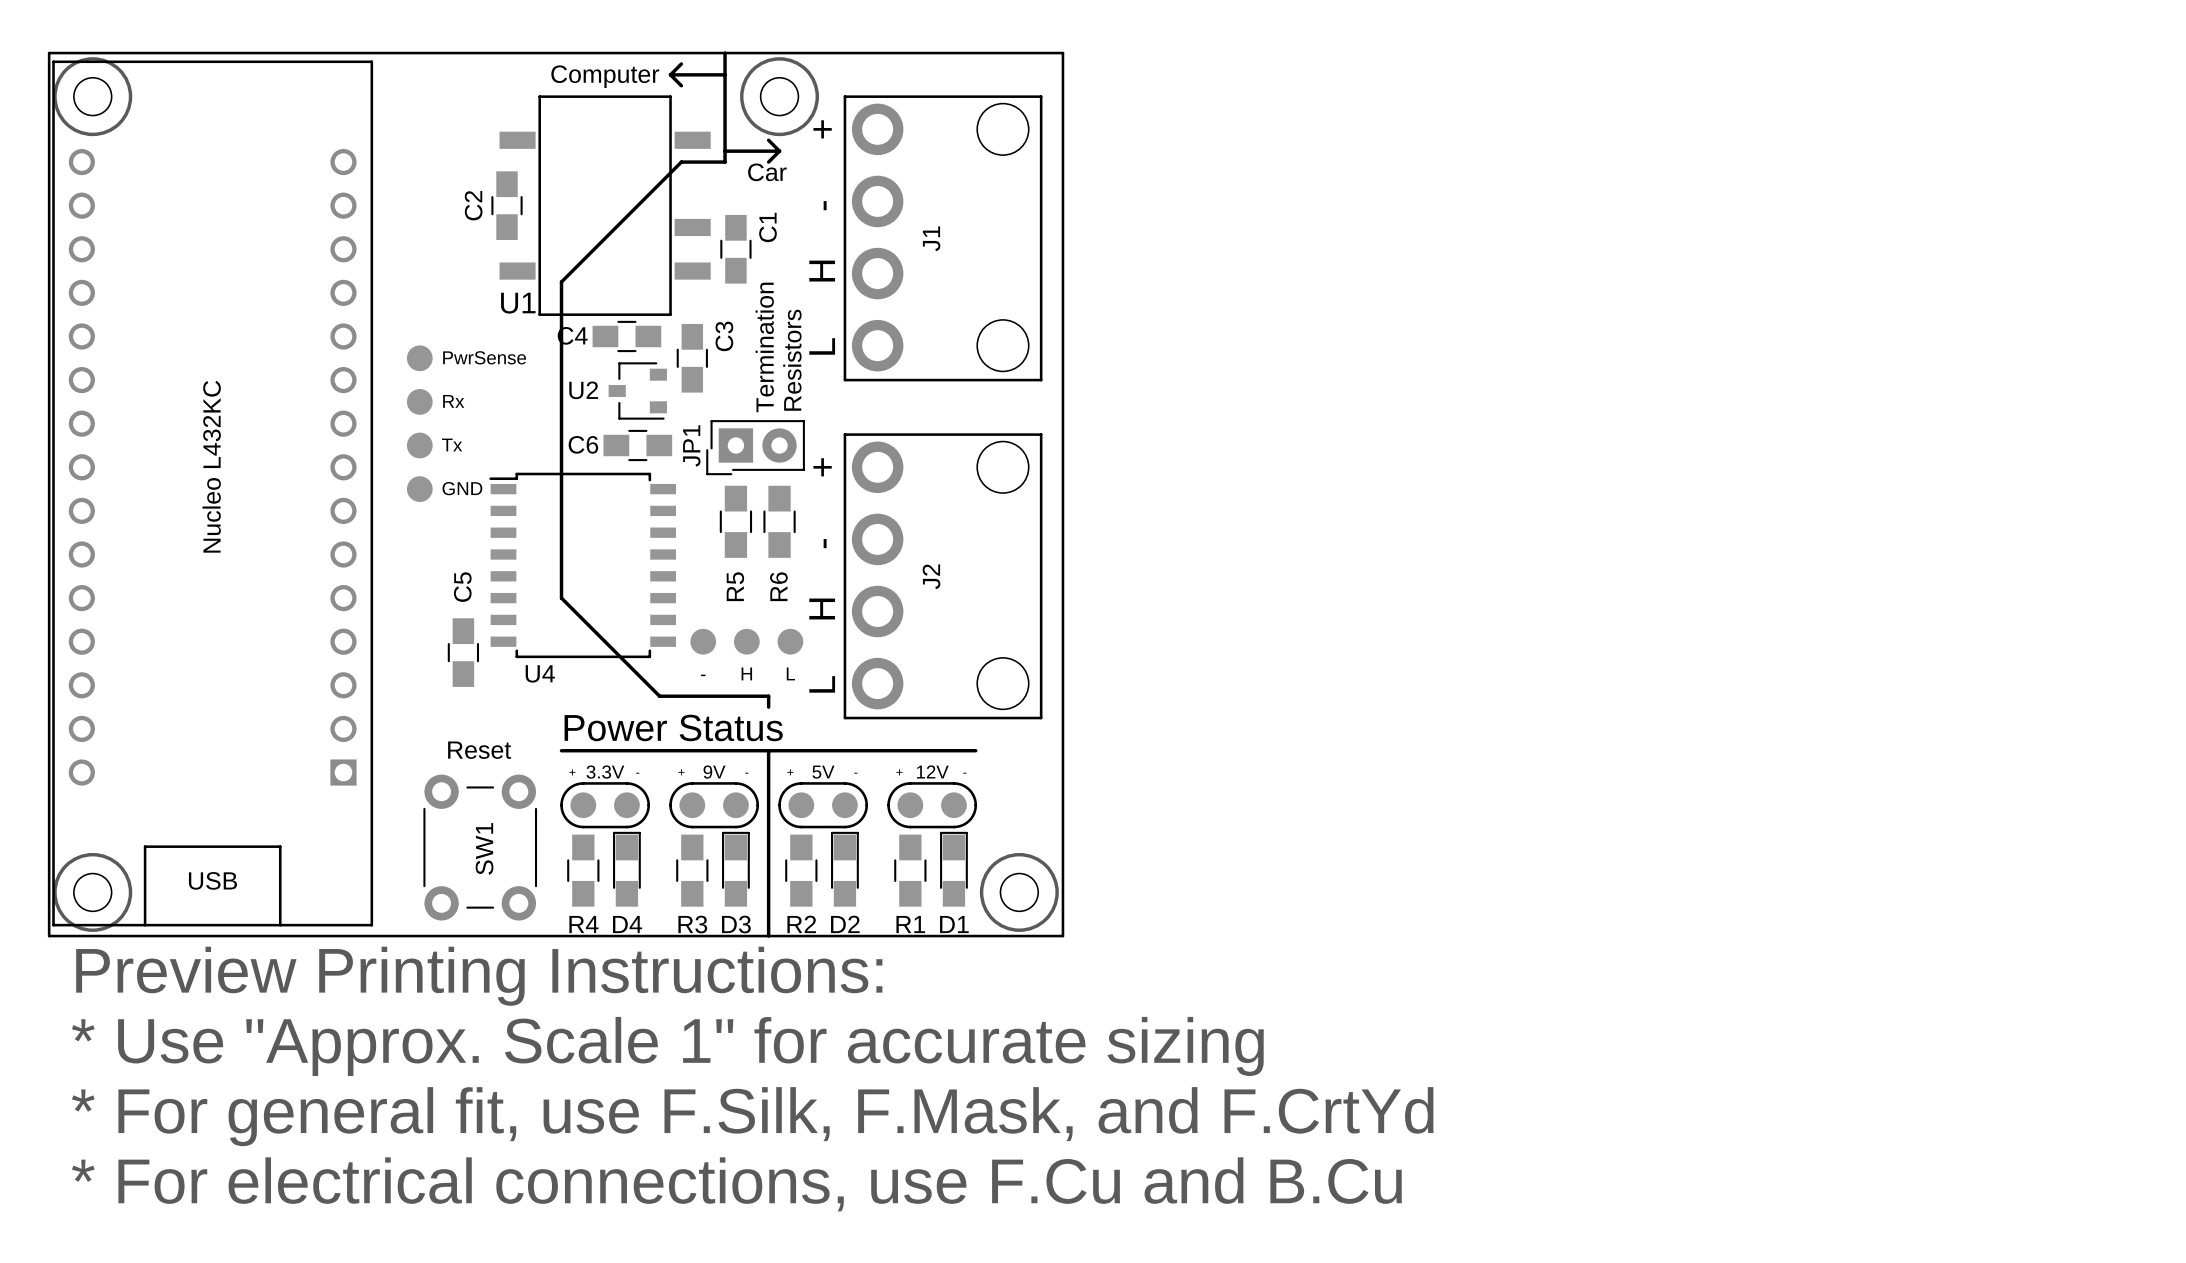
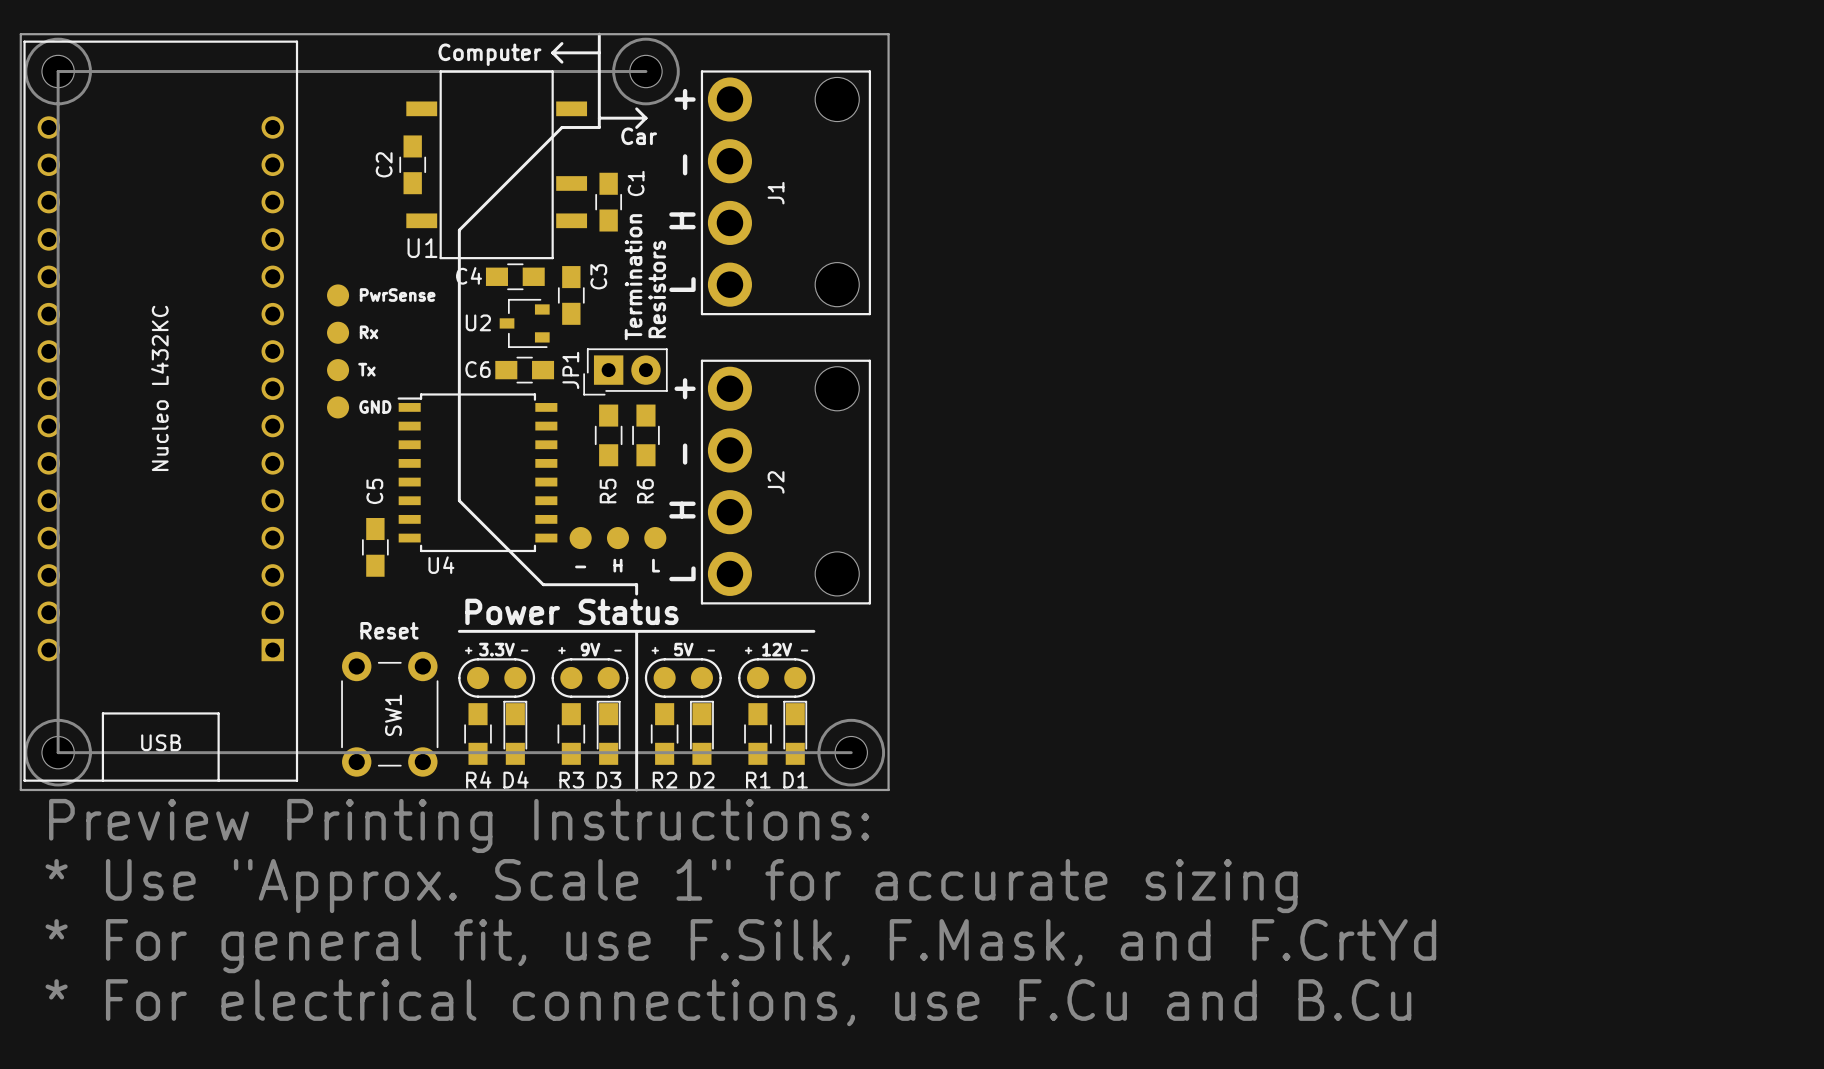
line: none -> (645, 71) (58, 71) (58, 752) (851, 752)

